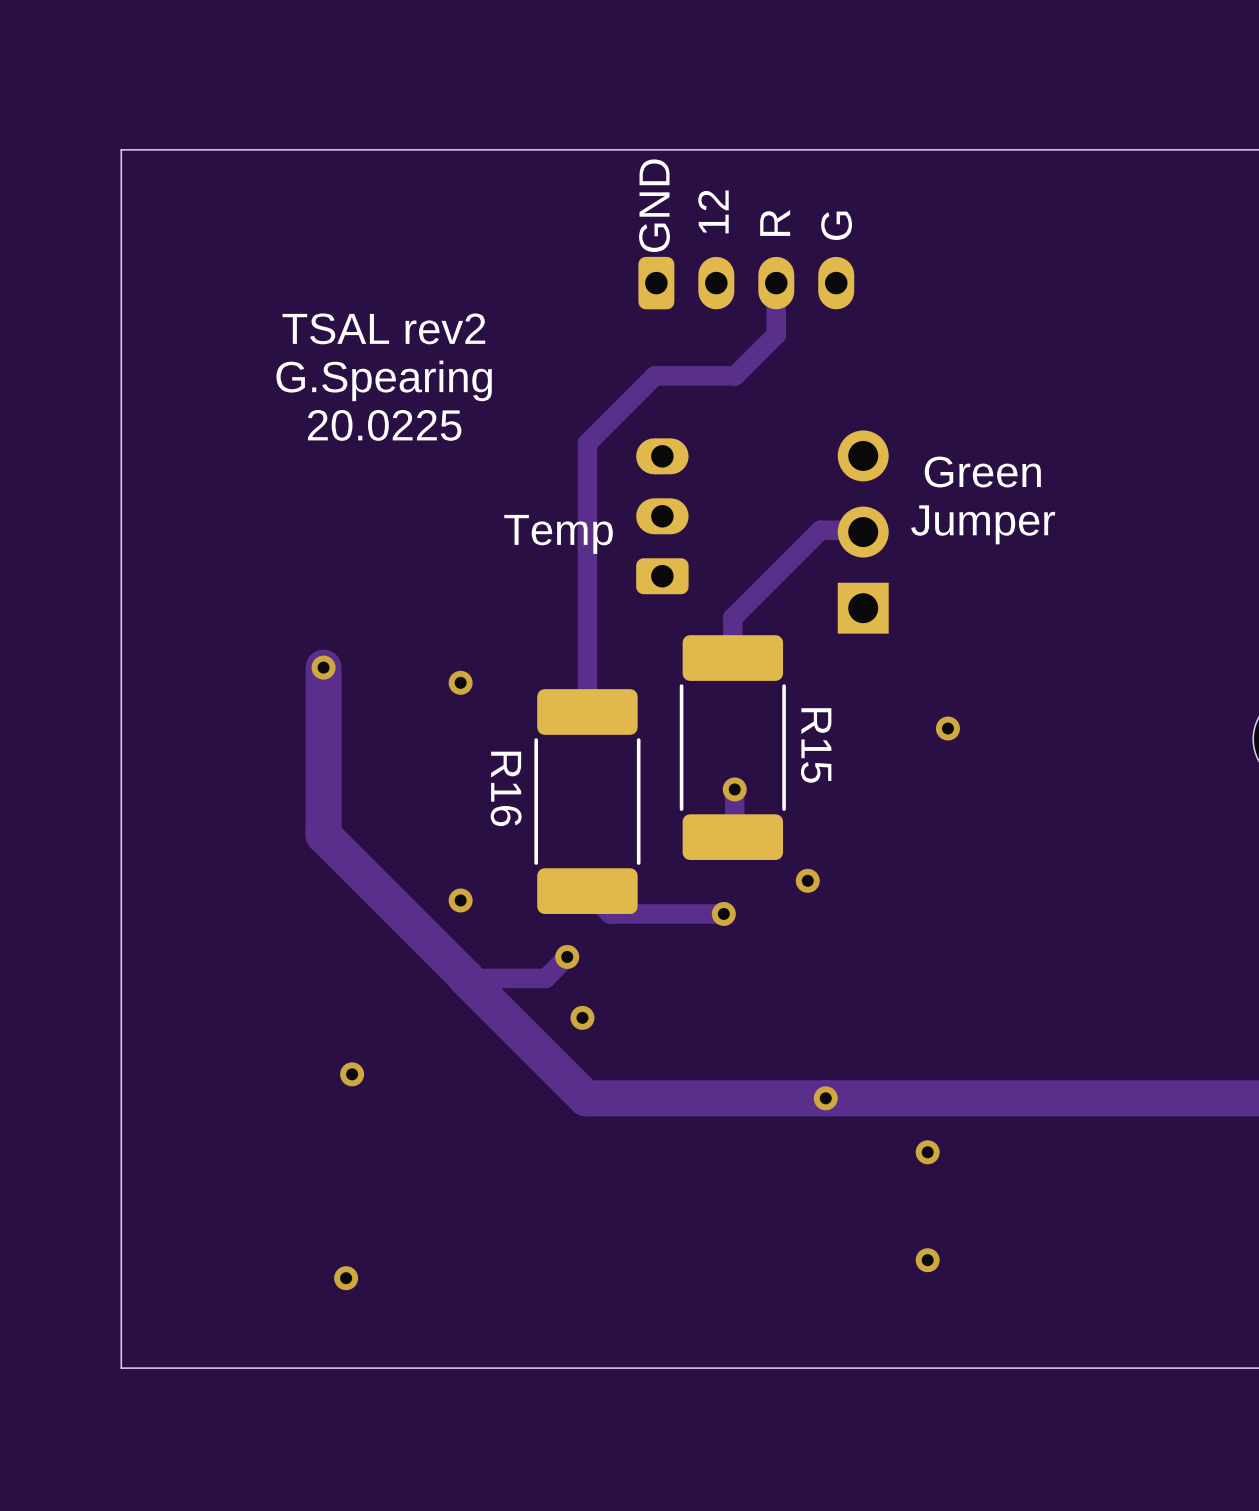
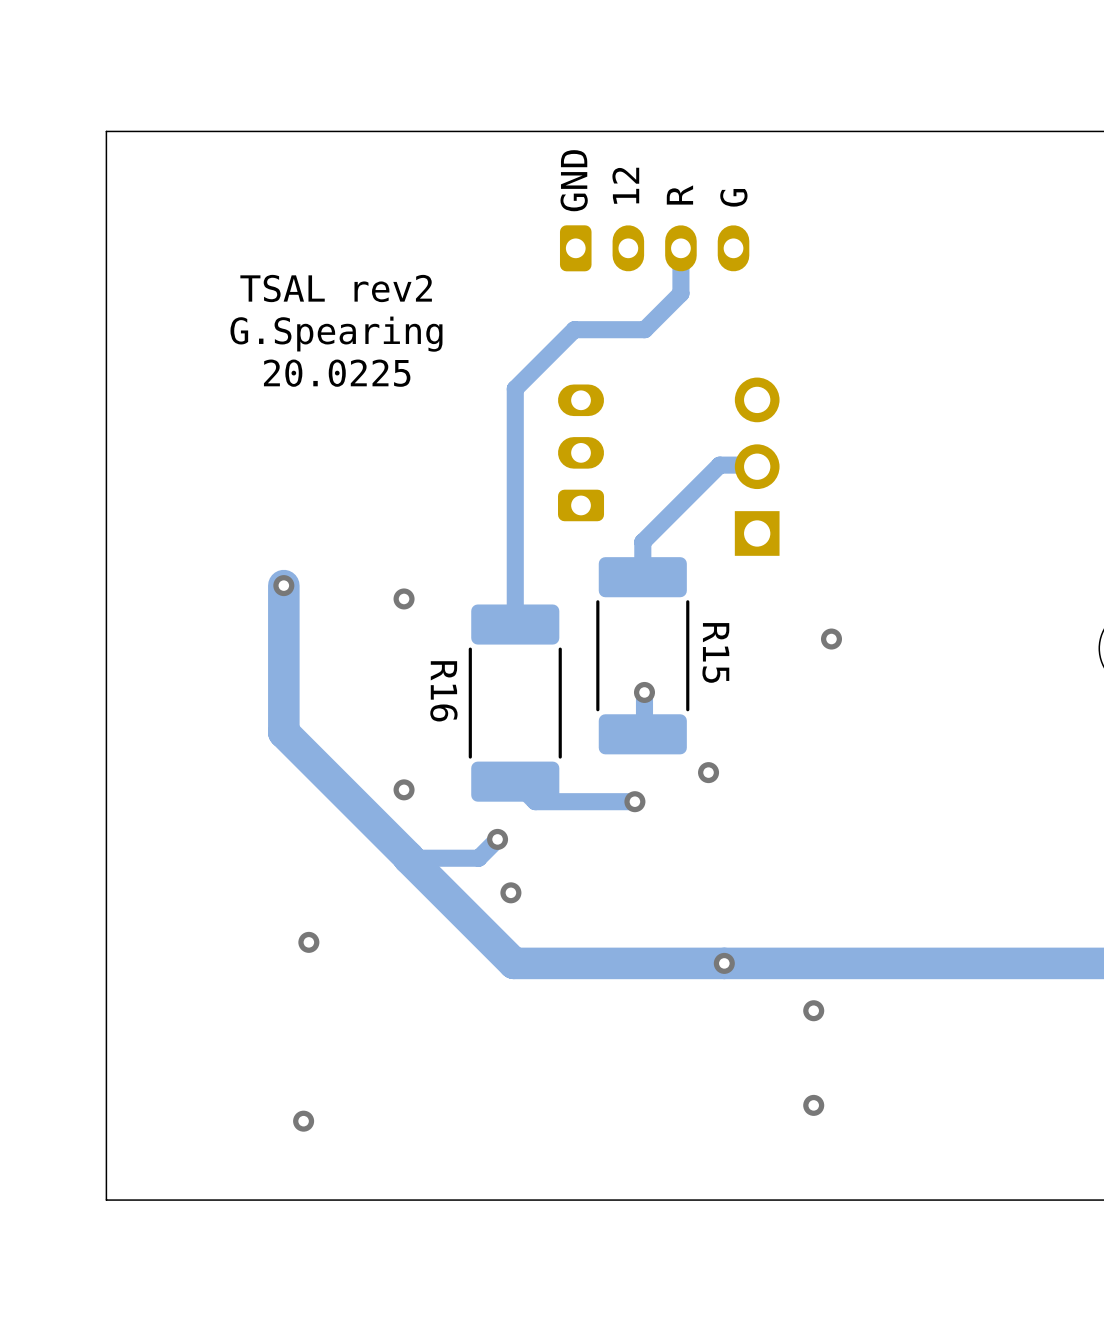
text: Green (982, 472) -> none
text: Jumper (983, 524) -> none
text: Temp (558, 534) -> none

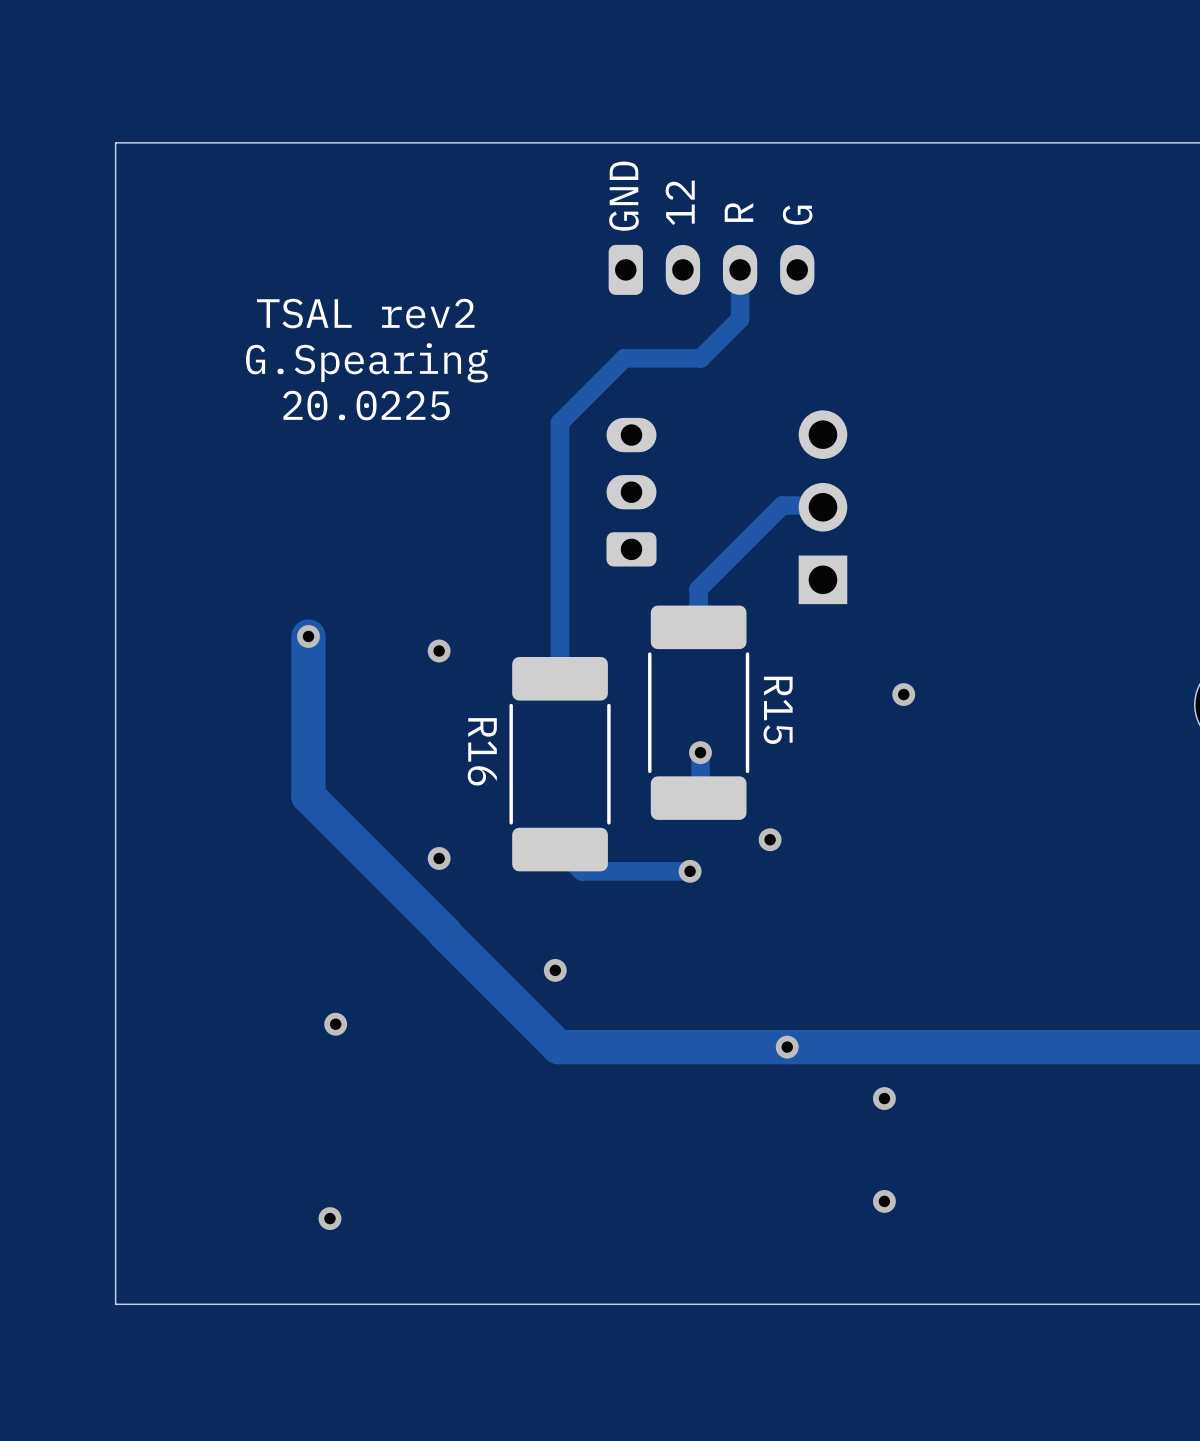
track: (497, 839) (478, 858) (408, 858) -> none
via: (497, 839) -> none

